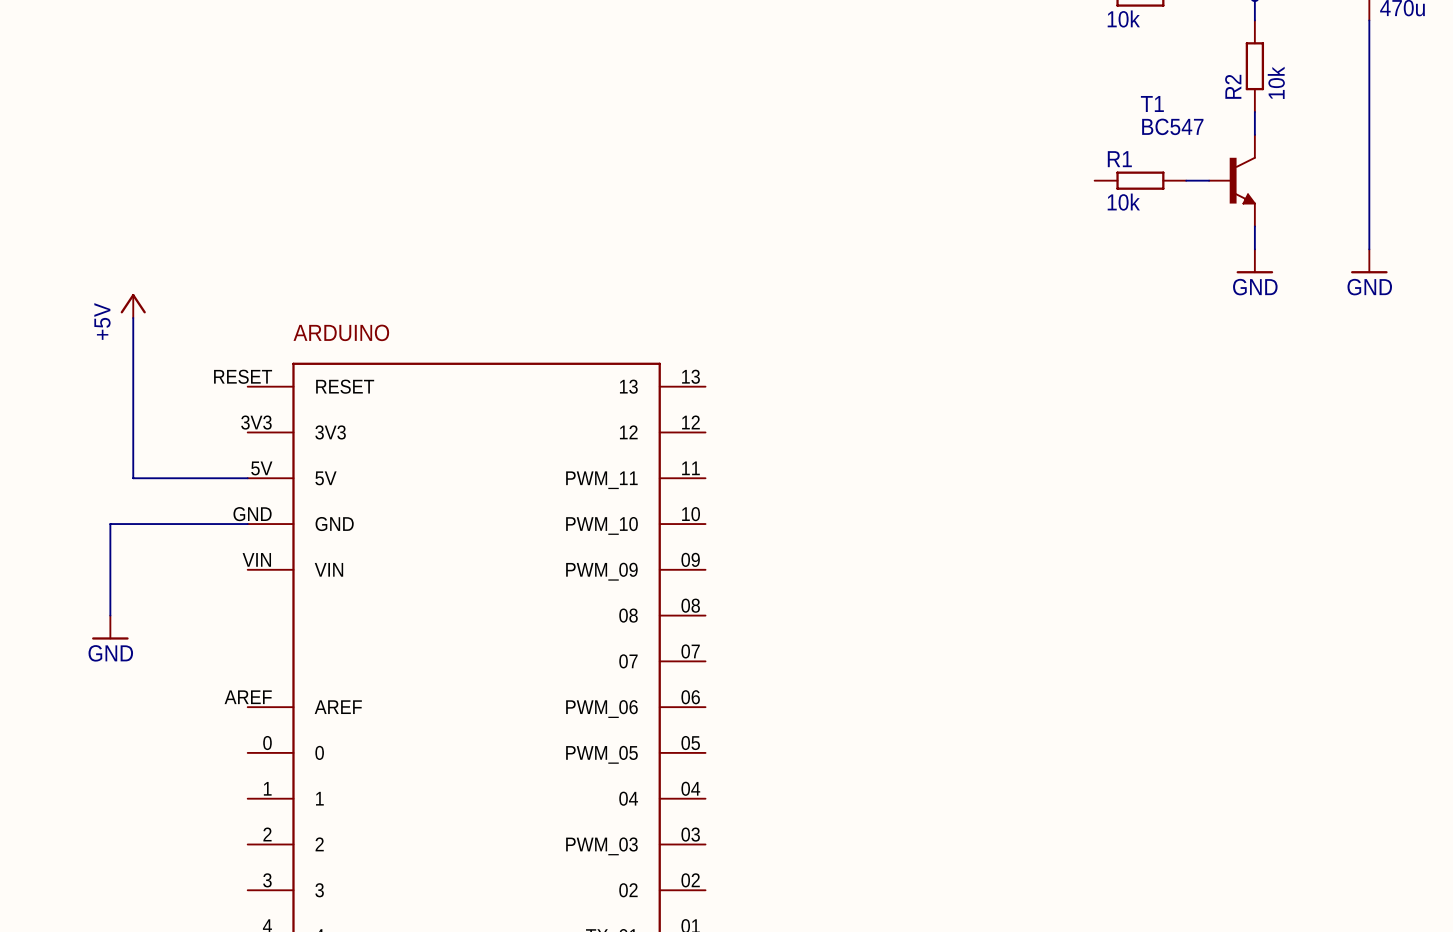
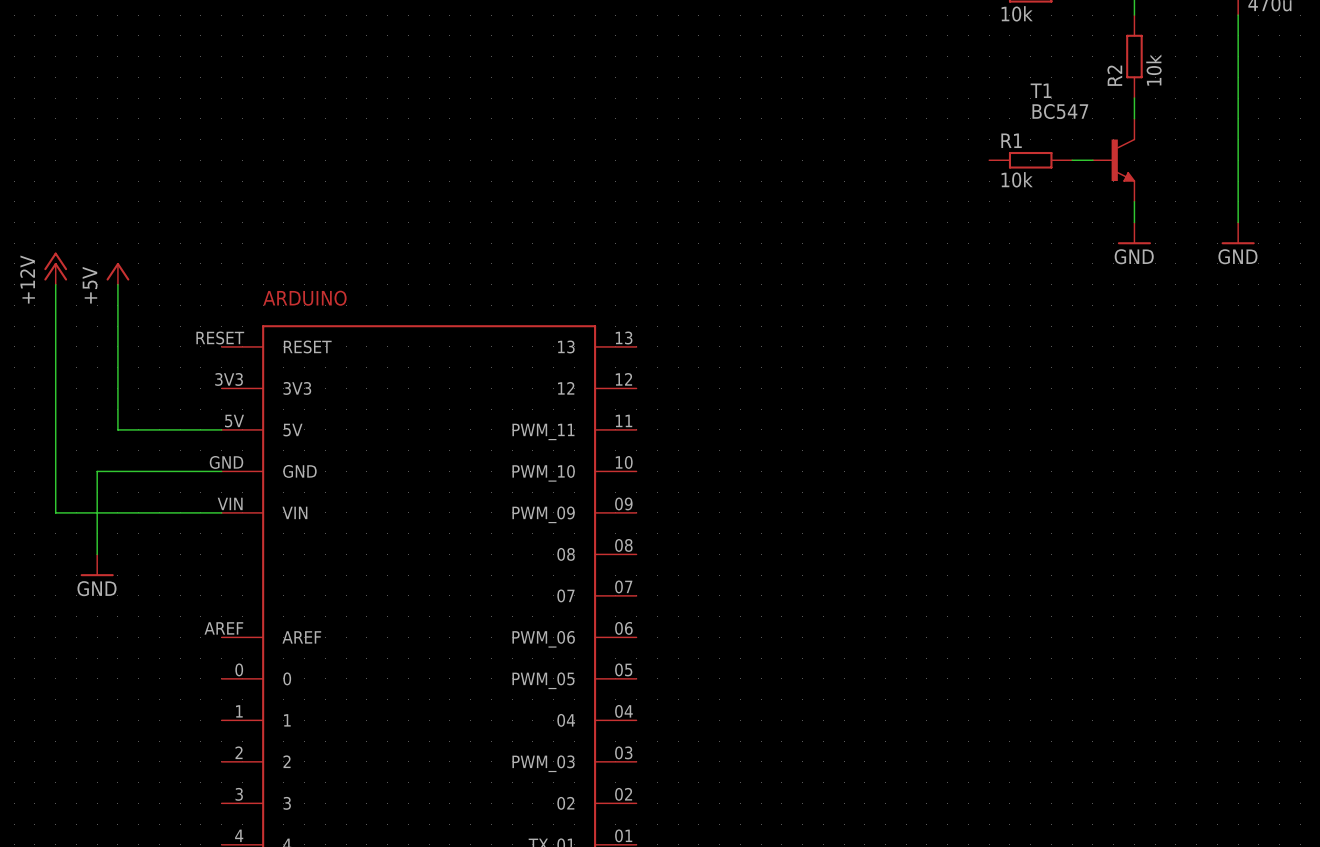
power symbol: none -> +12V (55, 268)
wire: none -> (55, 284) (55, 512) (221, 512)

